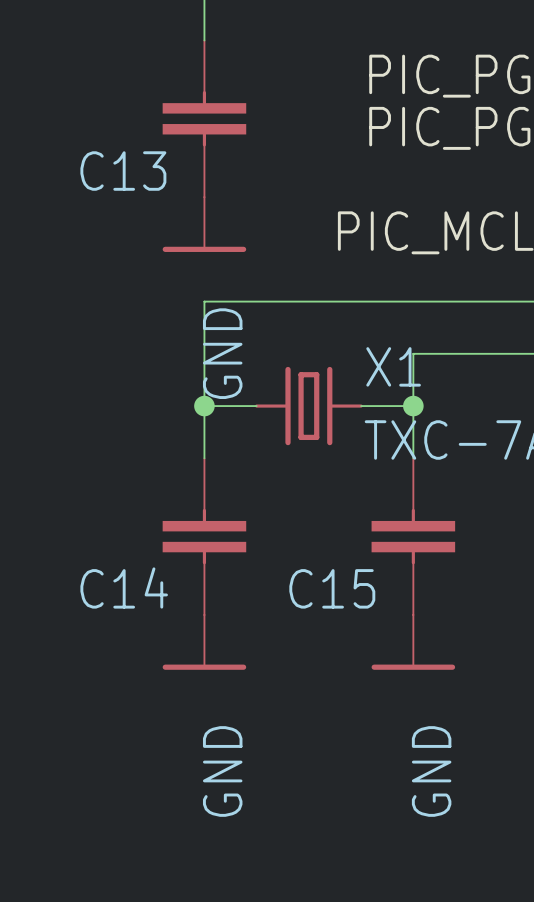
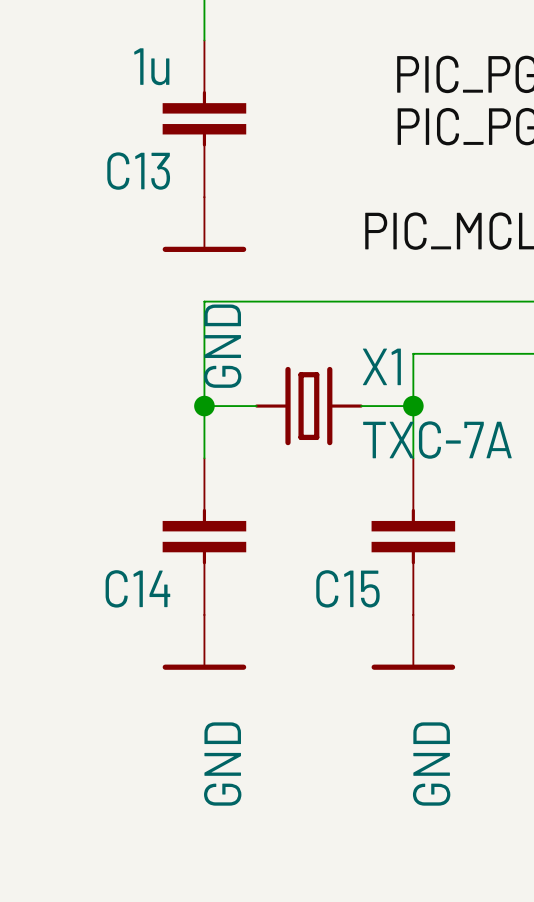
C13 value: none -> 1u (151, 66)

